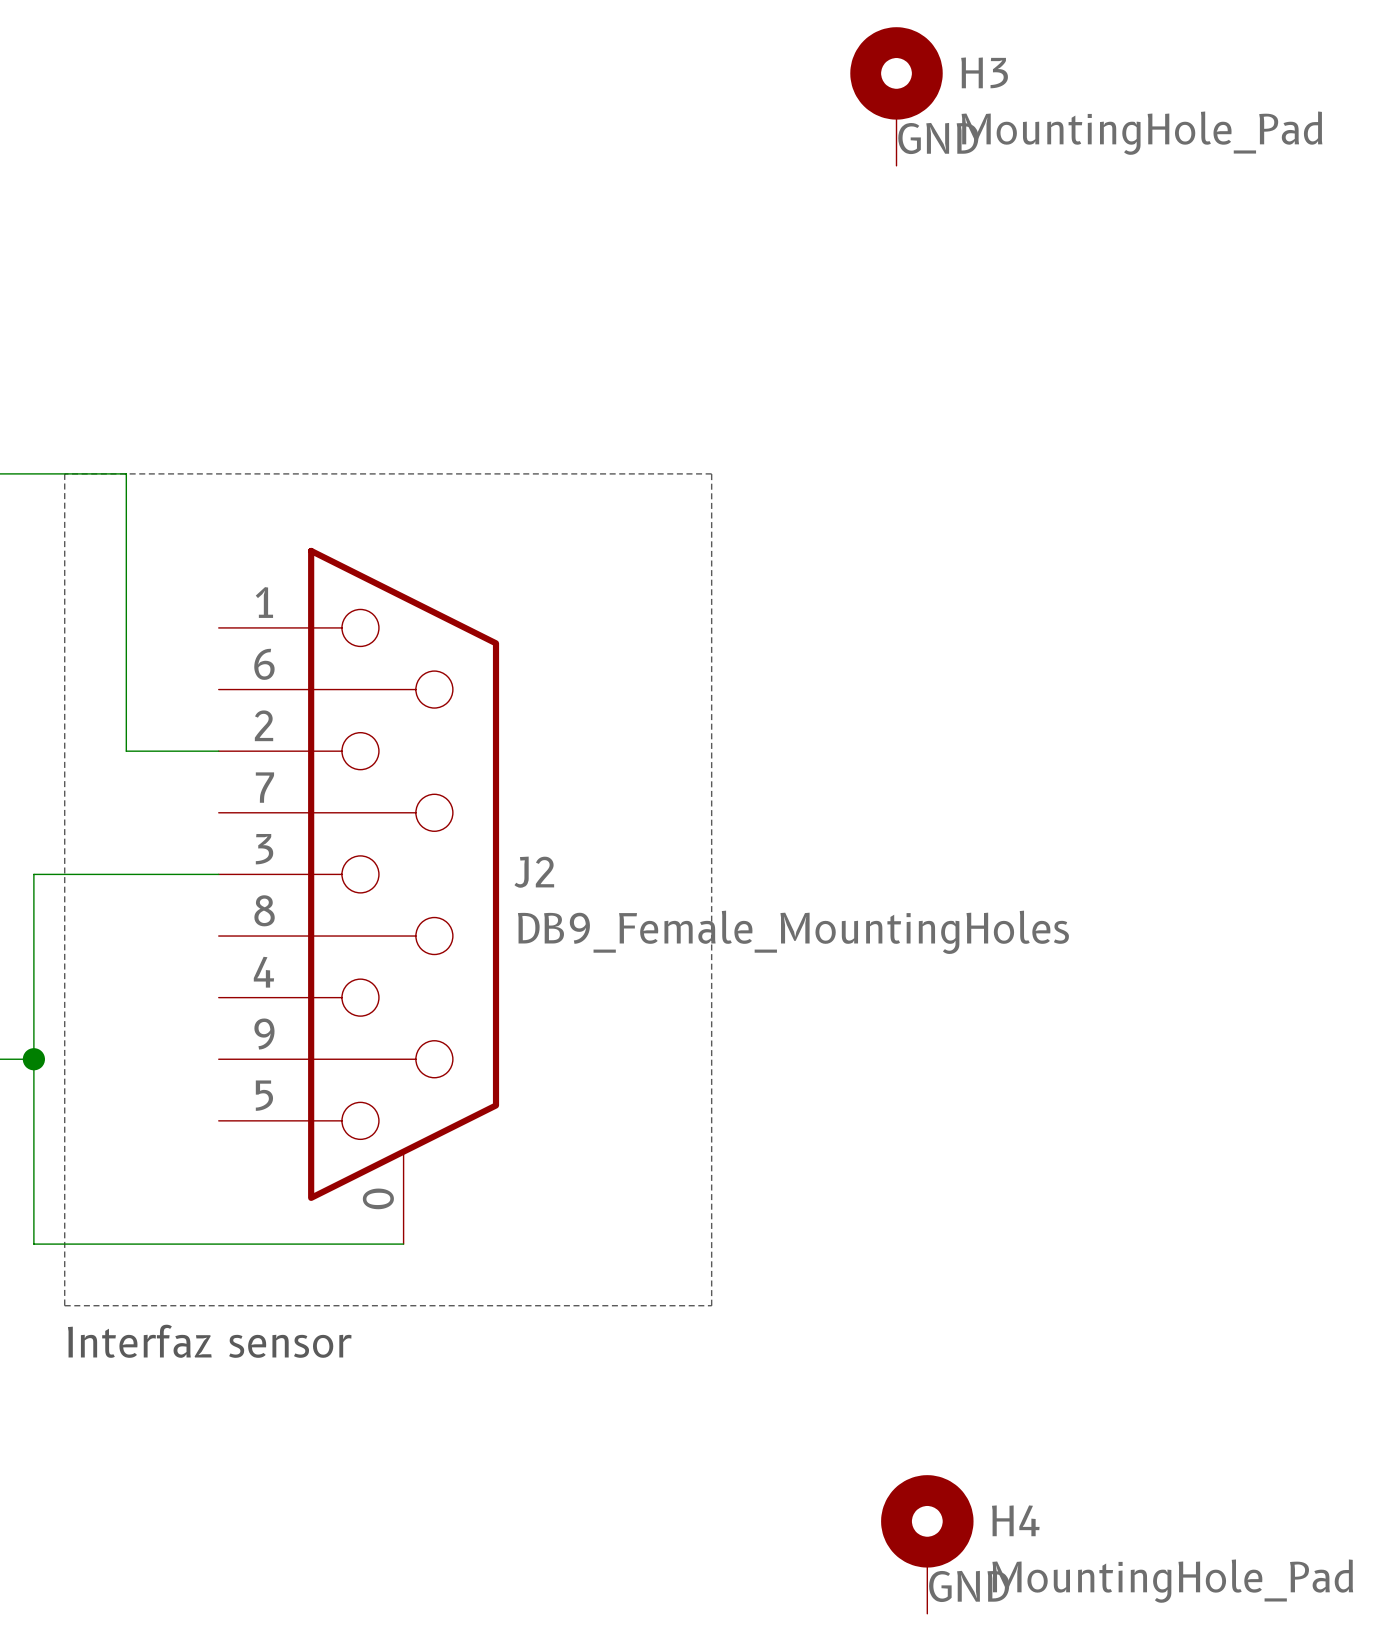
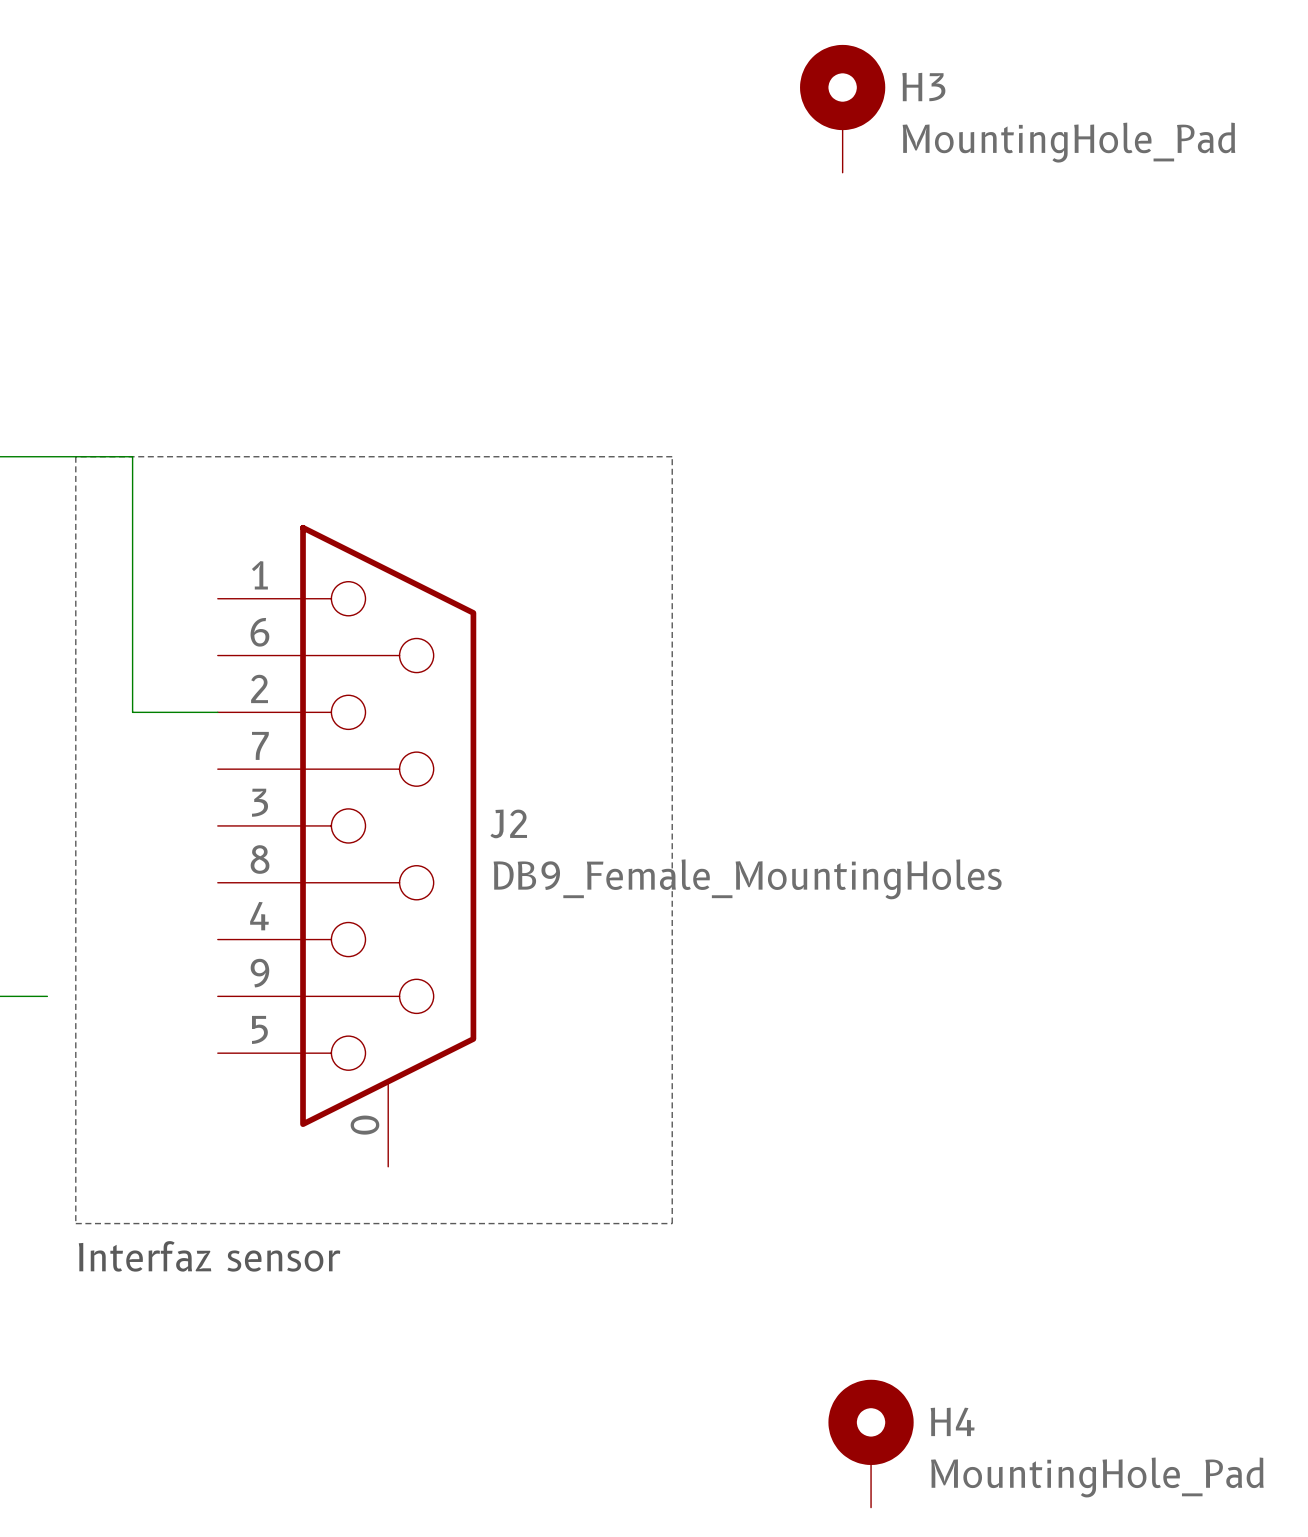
label: GND (938, 138) -> none
wire: (218, 874) (33, 874) (33, 1244) (403, 1244) -> none
junction: (33, 1059) -> none
label: GND (969, 1586) -> none

